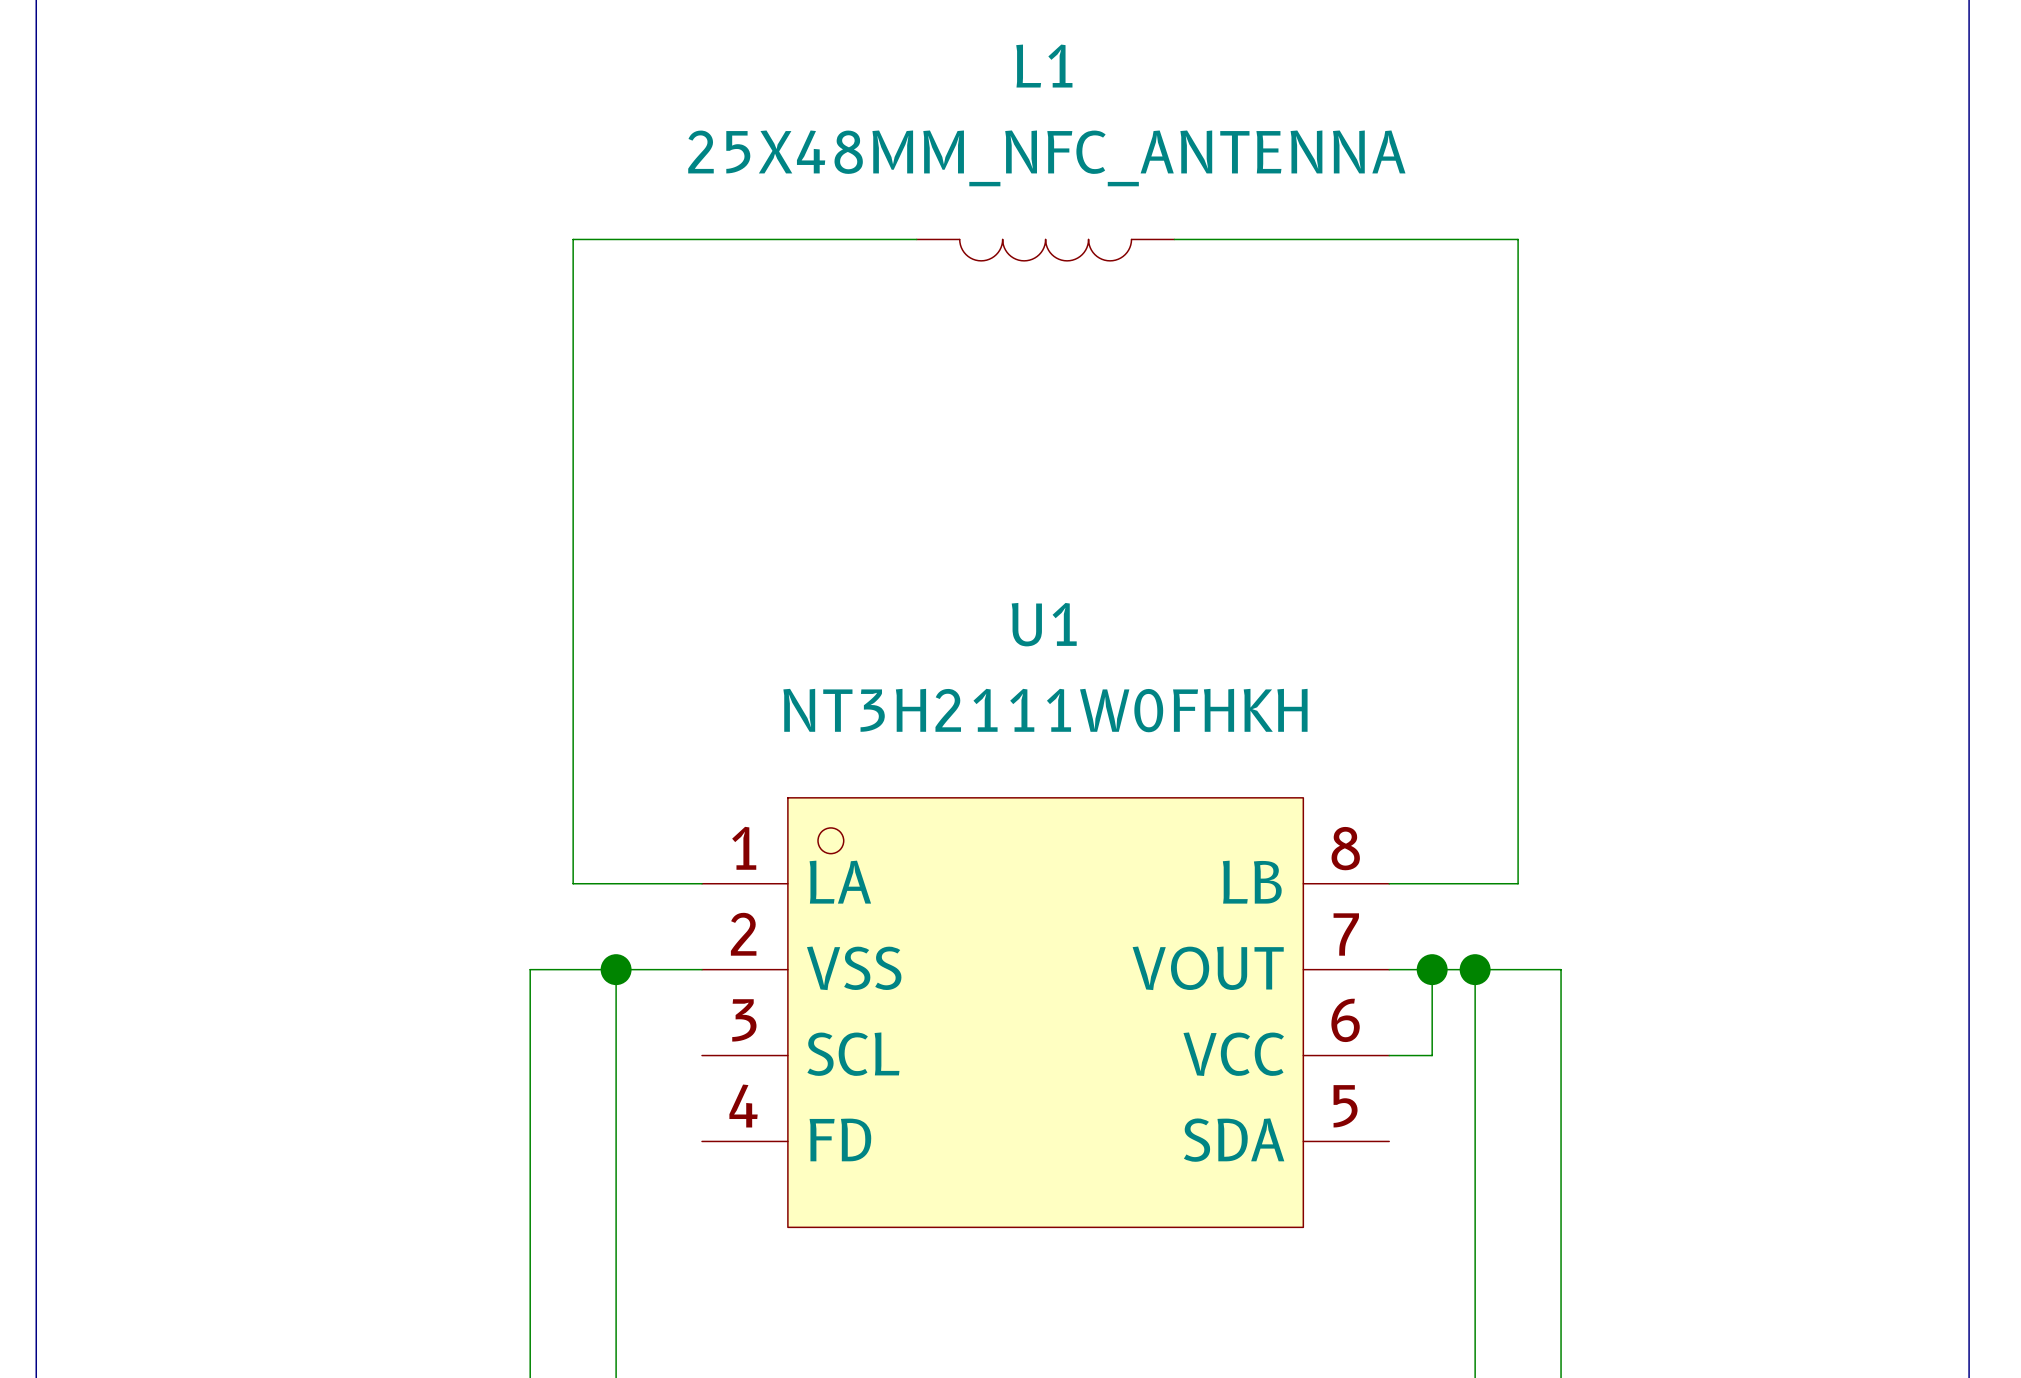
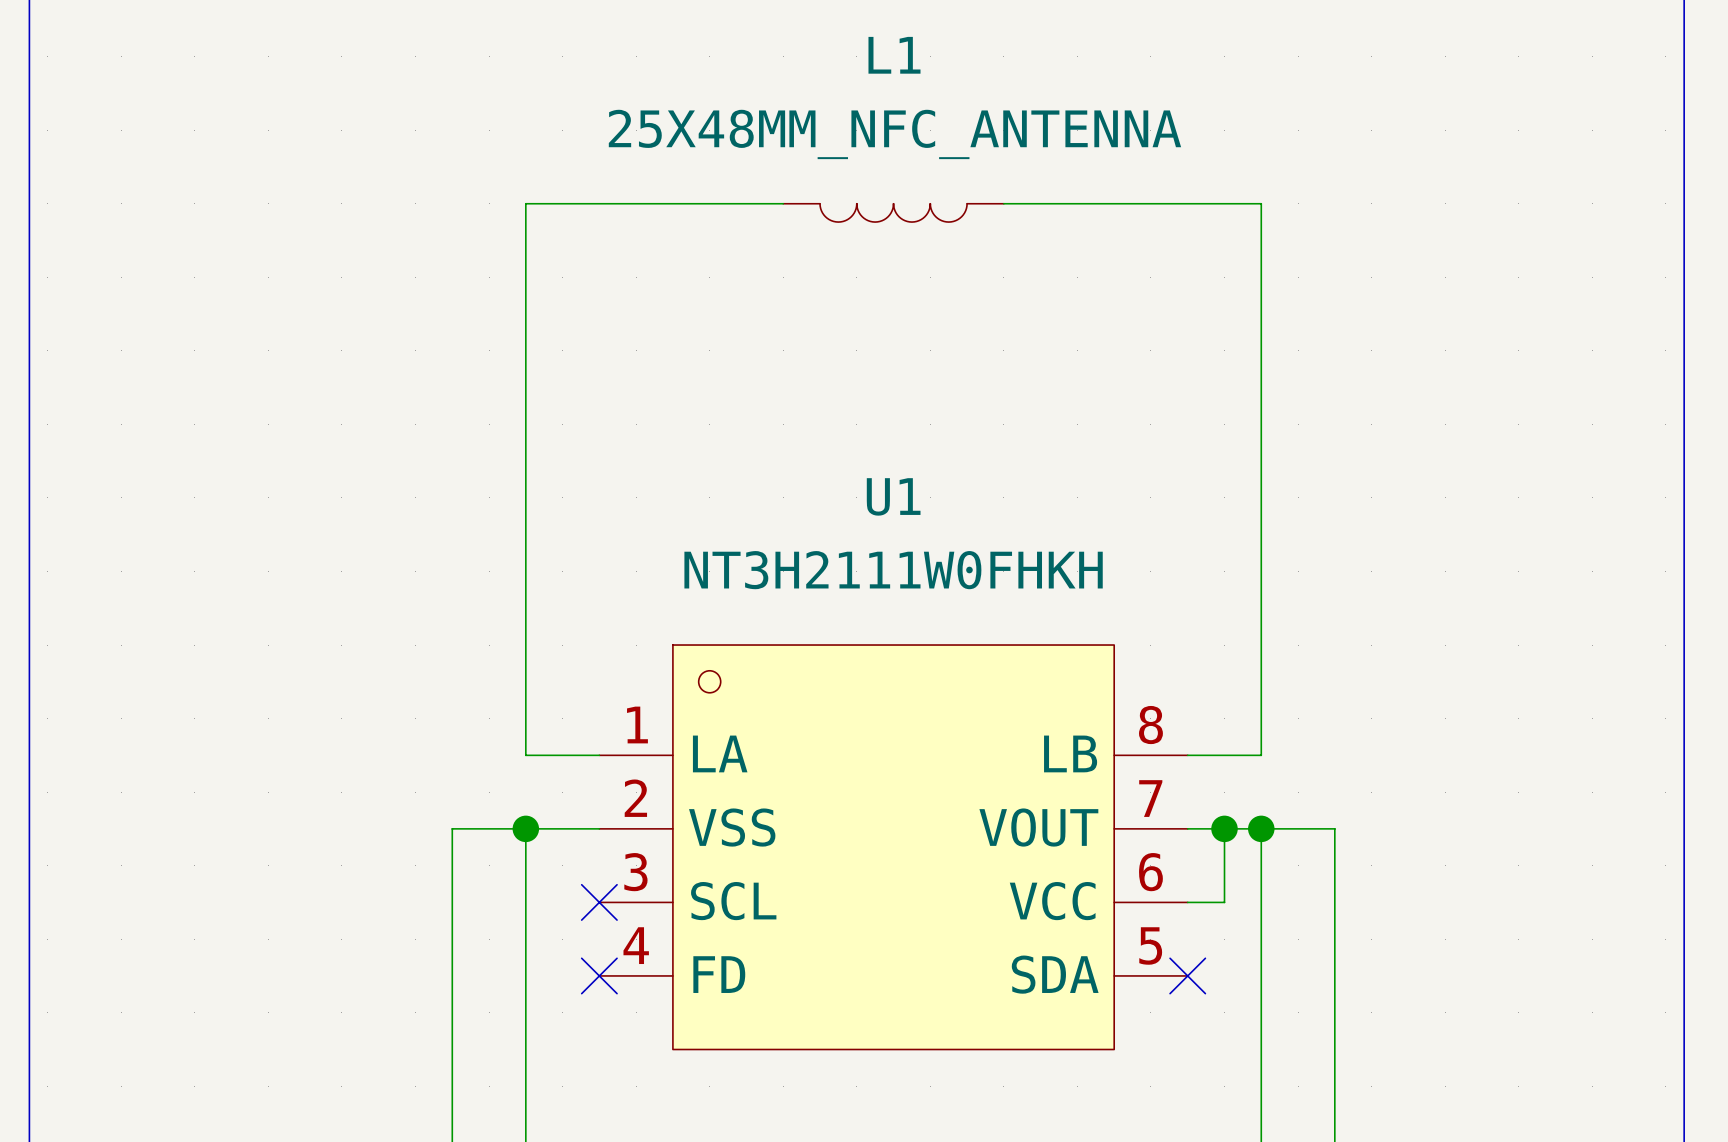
wire: (616, 239) (573, 239) (573, 883) (616, 883) -> (525, 203) (525, 755)
wire: (1475, 239) (1518, 239) (1518, 883) (1475, 883) -> (1261, 203) (1261, 755)
U1 symbol: [702, 797, 1390, 1228] -> [599, 645, 1188, 1050]
no-connect mark: none -> (599, 902)
no-connect mark: none -> (599, 975)
no-connect mark: none -> (1187, 975)

